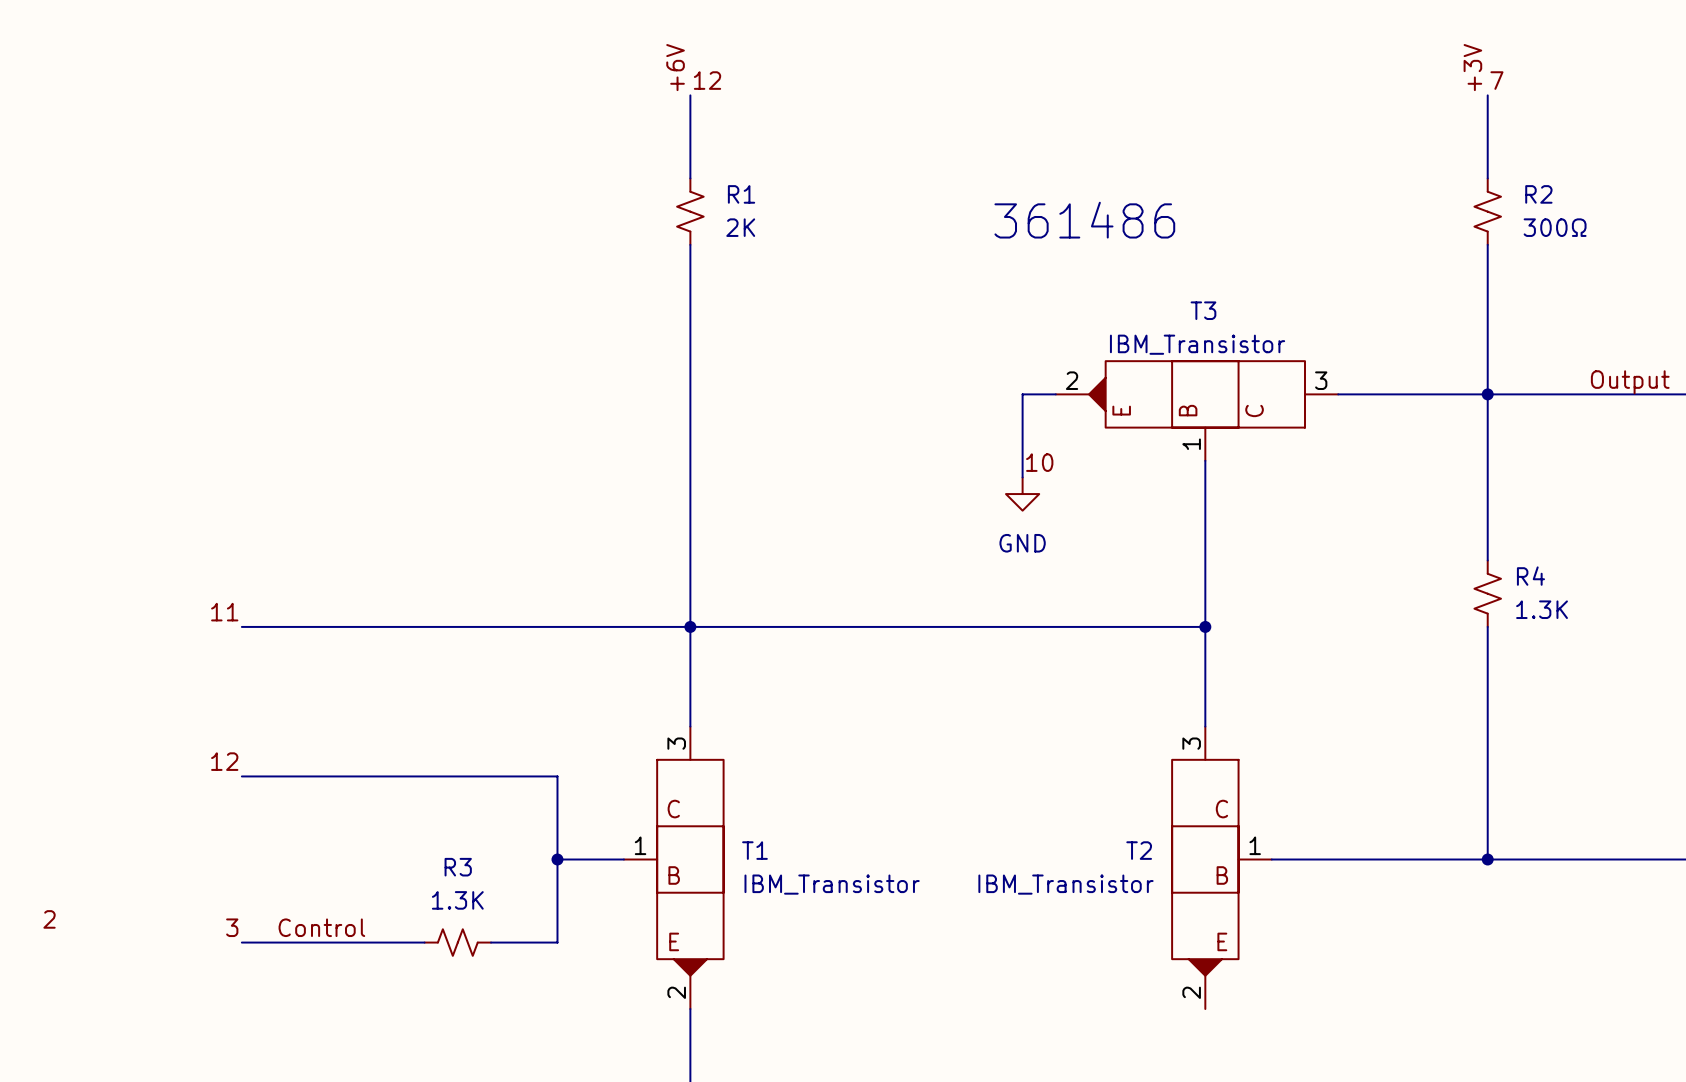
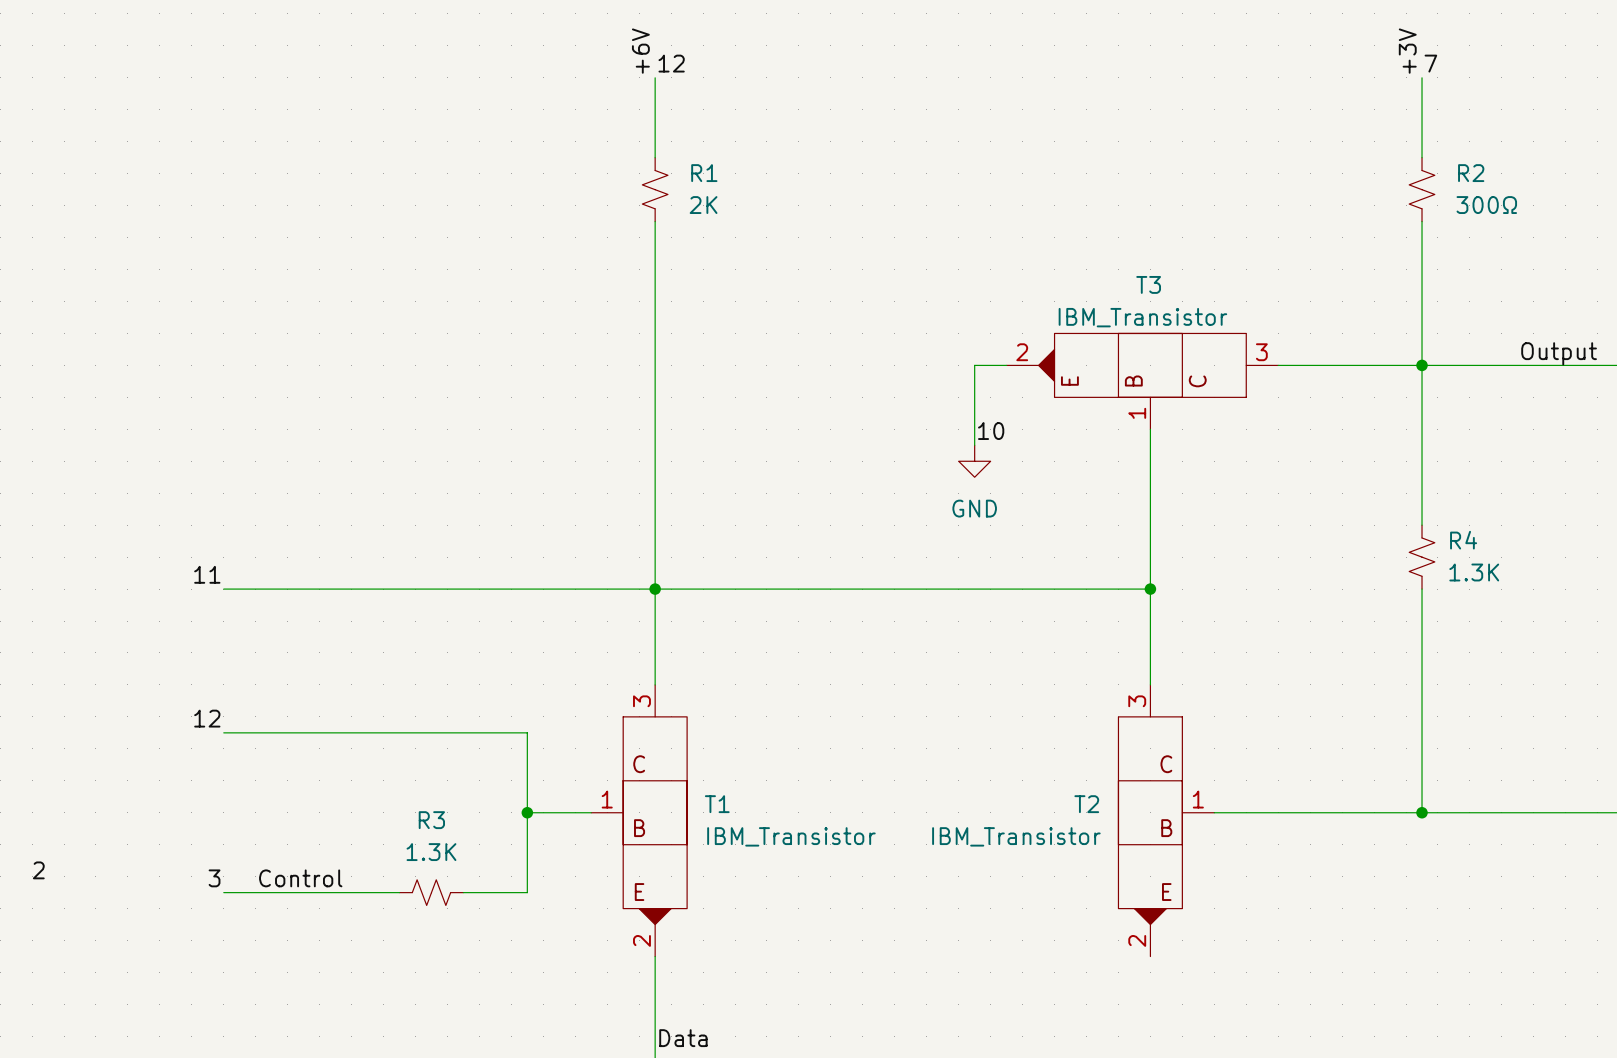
text: 361486 (1084, 220) -> none

